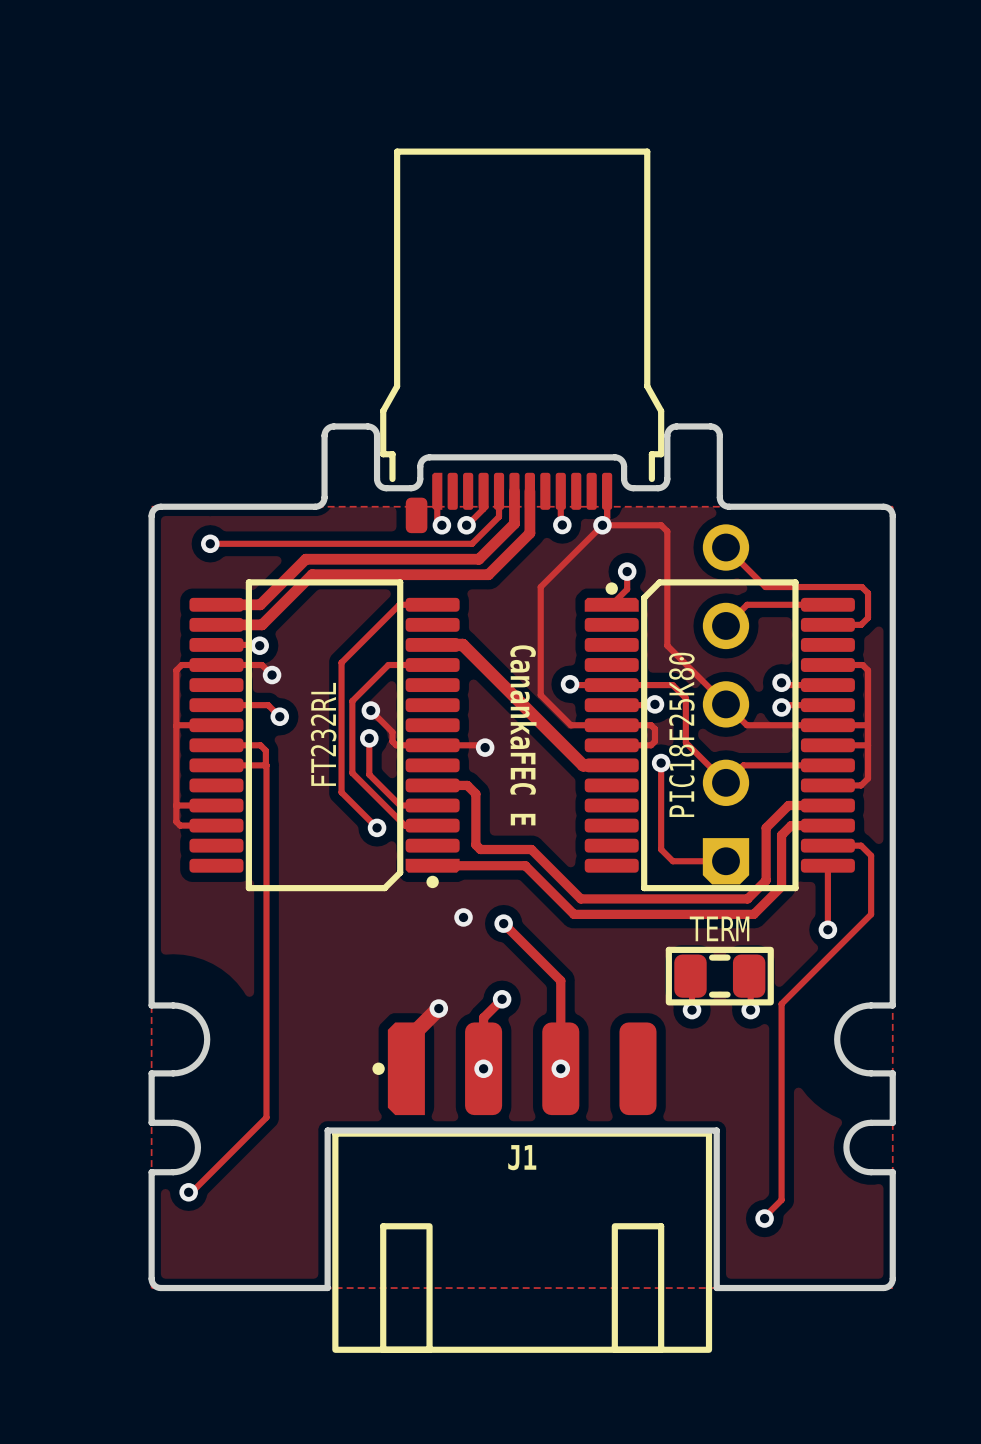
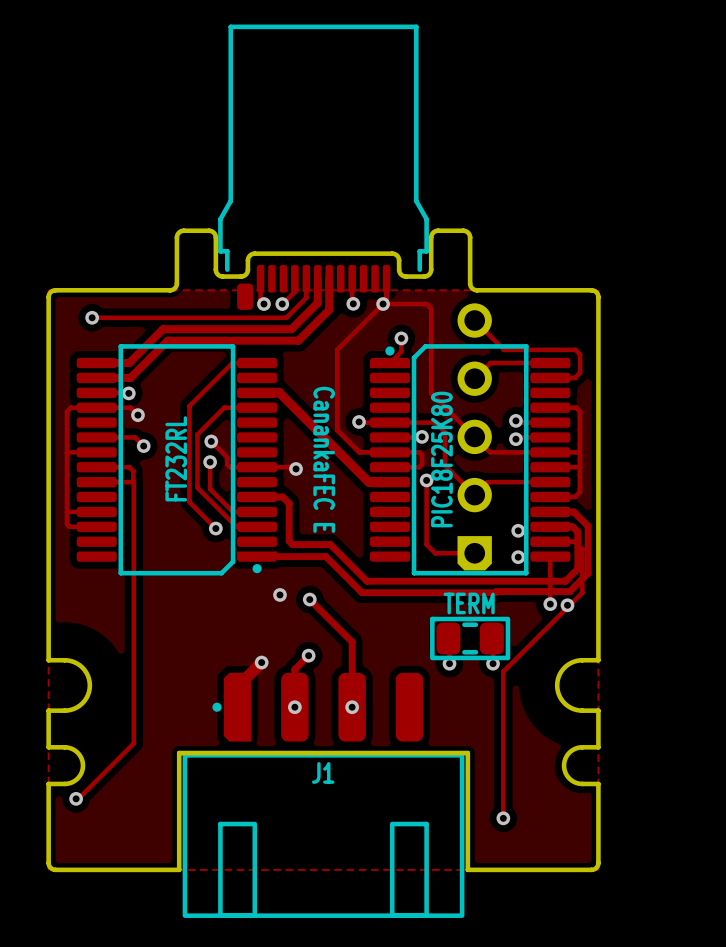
track: (827, 805) (788, 805) (766, 827) (766, 880) (747, 898) -> (550, 511) (573, 511) (588, 526) (588, 573) (569, 591) (496, 591)
track: (827, 825) (791, 825) (781, 835) (781, 886) (755, 912) -> (550, 526) (572, 526) (577, 531) (577, 568) (565, 581) (490, 581)
via: none -> (518, 530)
via: none -> (518, 557)
via: none -> (567, 605)
track: (781, 1003) (781, 1200) (764, 1217) -> (515, 659) (503, 671) (503, 817)

